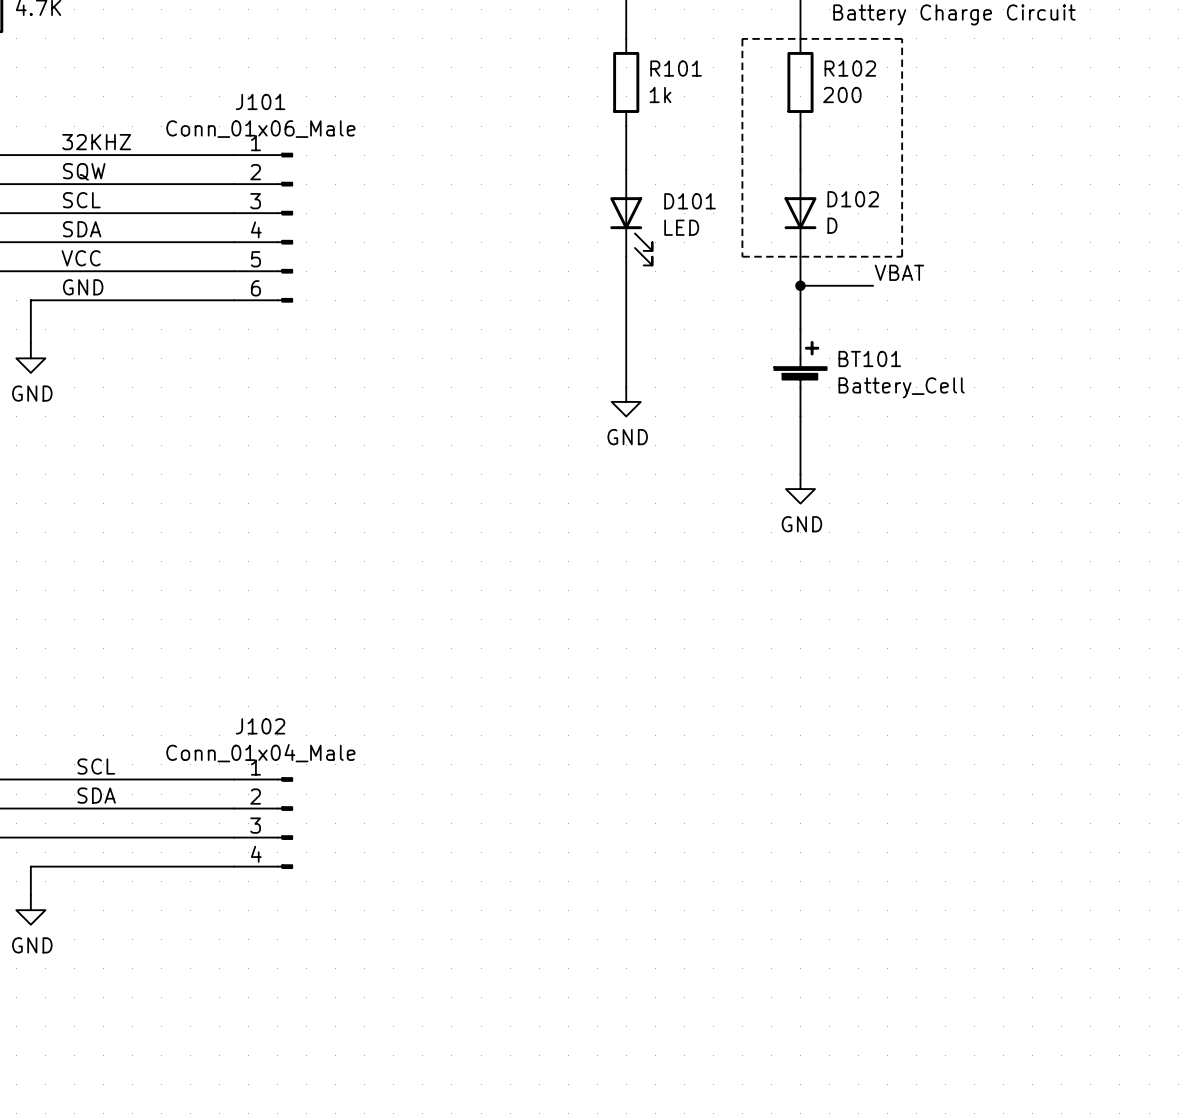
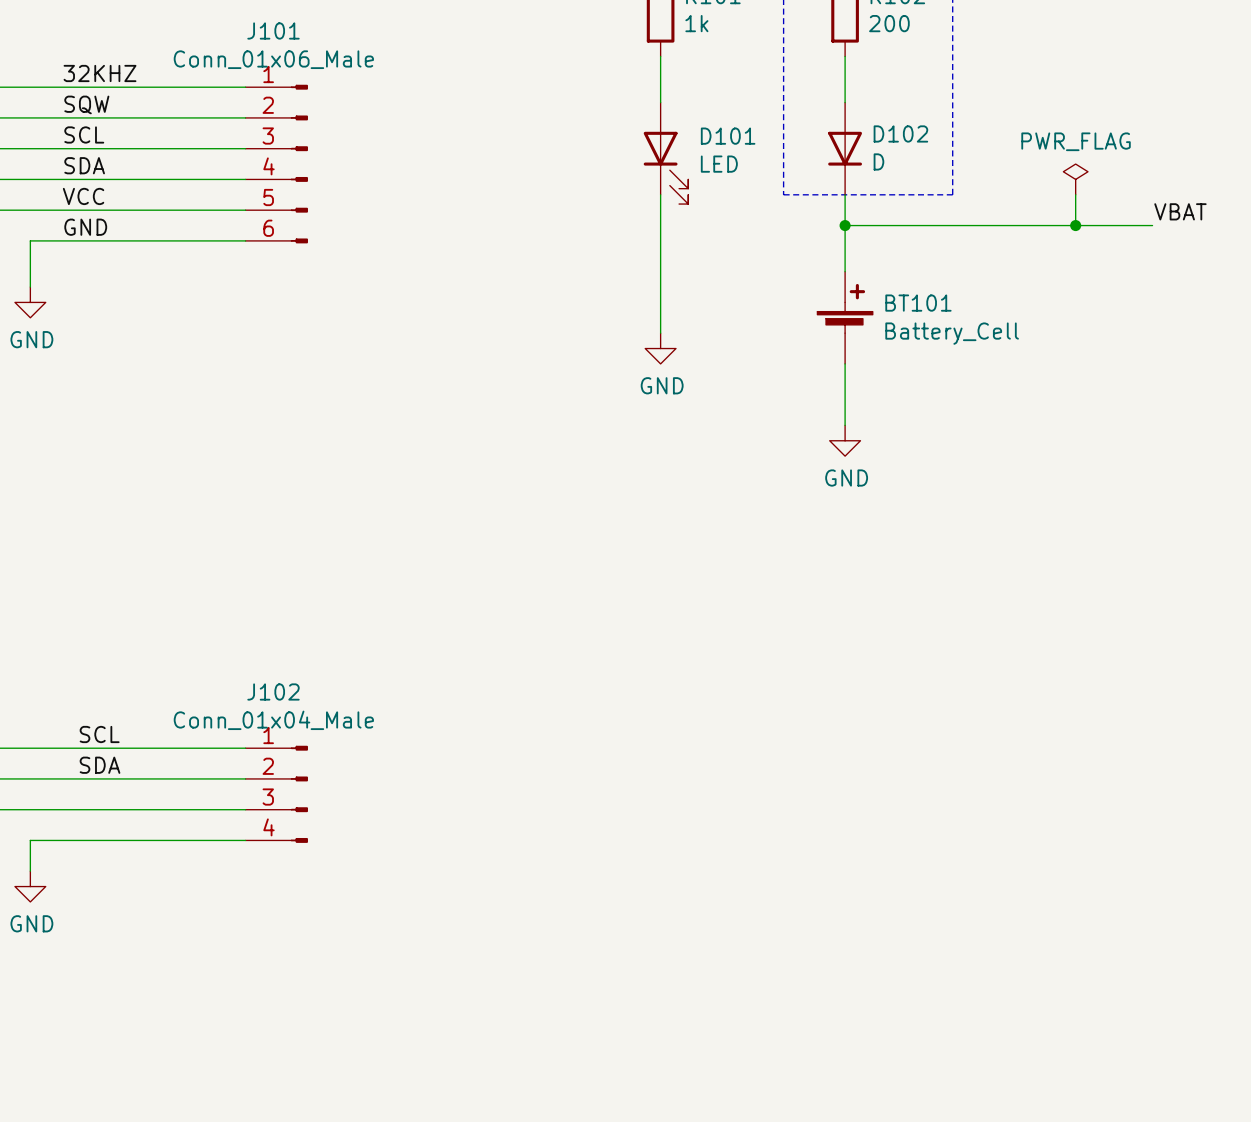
power symbol: none -> PWR_FLAG (1075, 179)
wire: none -> (1075, 194) (1075, 225)
label position: VBAT (899, 272) -> VBAT (1180, 211)
wire: none -> (921, 225) (1152, 225)
junction: none -> (1075, 225)

